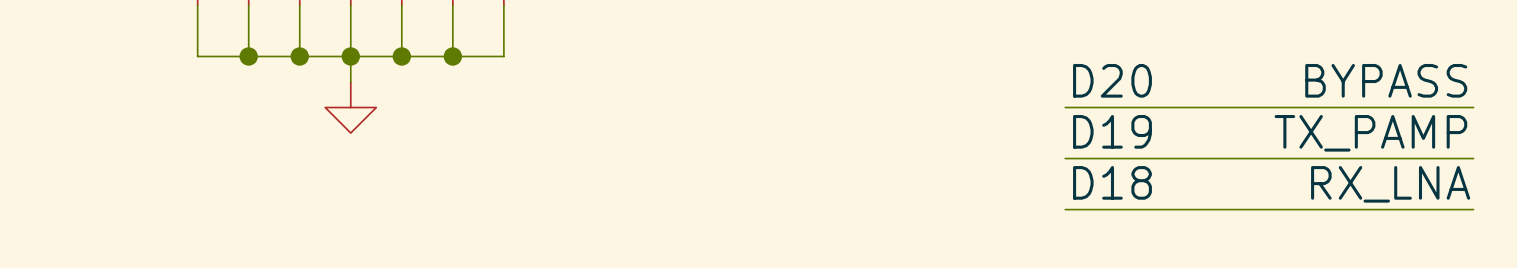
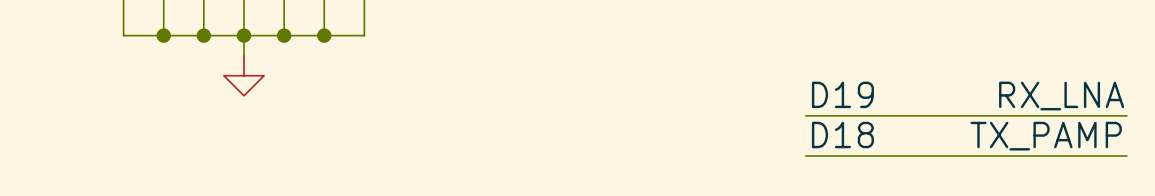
label: D20 (1112, 80) -> none
label: BYPASS (1386, 80) -> none
wire: (1065, 107) (1473, 107) -> none
label: TX_PAMP (1370, 133) -> RX_LNA (1061, 96)
label: RX_LNA (1390, 184) -> TX_PAMP (1046, 136)

